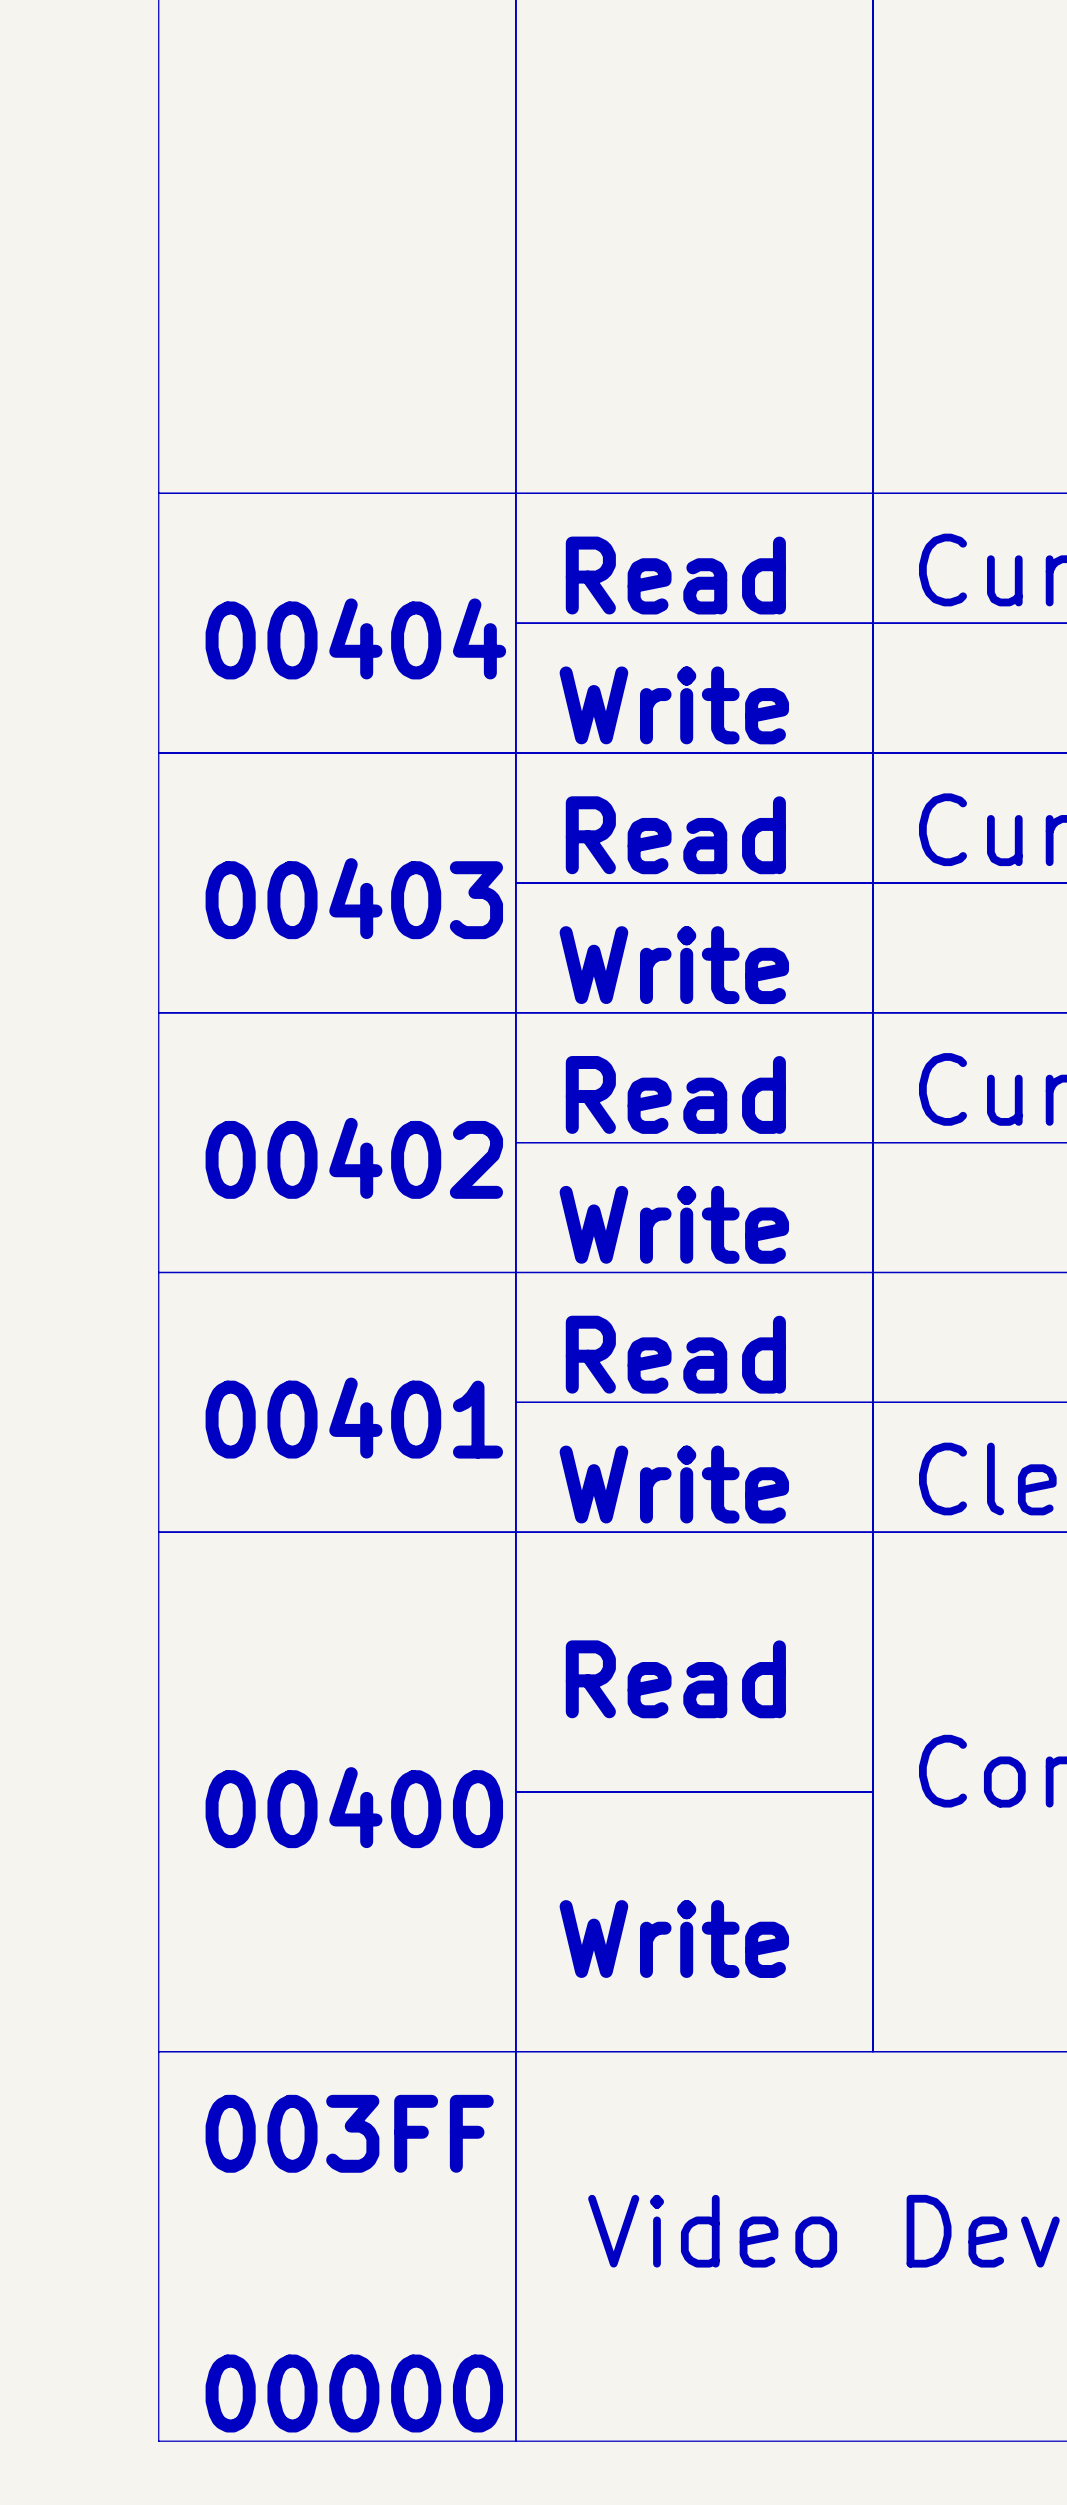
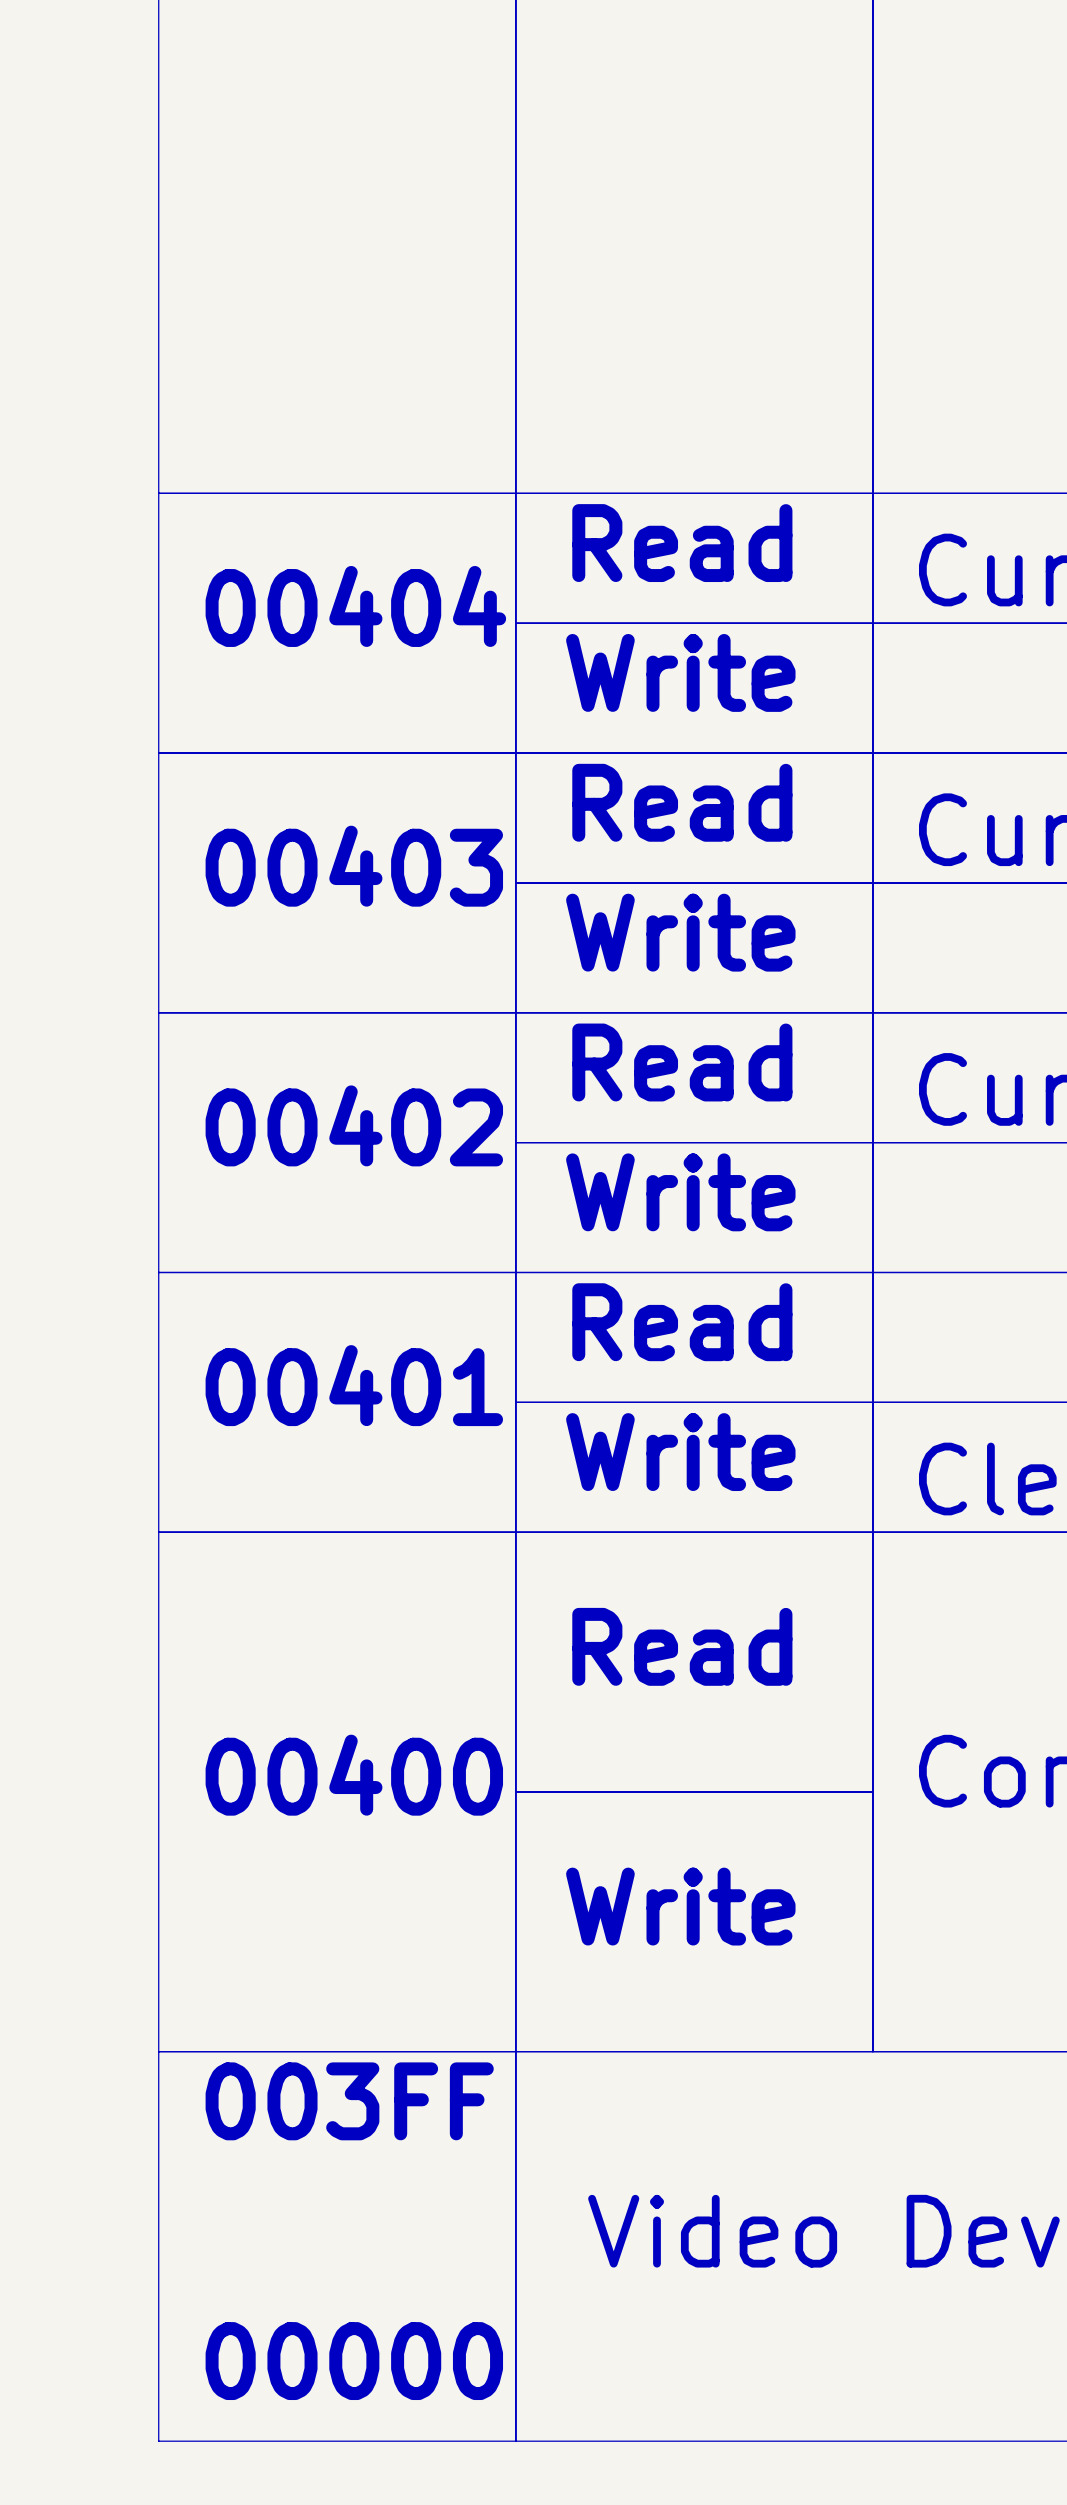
text position: Read (675, 575) -> Read (682, 543)
text position: 00404 (355, 638) -> 00404 (355, 606)
text position: Write (674, 705) -> Write (680, 672)
text position: Read (675, 835) -> Read (682, 802)
text position: 00403 (354, 898) -> 00403 (354, 866)
text position: Write (674, 965) -> Write (680, 932)
text position: Read (675, 1094) -> Read (682, 1062)
text position: 00402 (354, 1158) -> 00402 (354, 1125)
text position: Write (674, 1224) -> Write (680, 1192)
text position: Read (675, 1354) -> Read (682, 1322)
text position: 00401 (354, 1418) -> 00401 (354, 1385)
text position: Write (674, 1484) -> Write (680, 1452)
text position: Read (675, 1679) -> Read (682, 1646)
text position: 00400 (354, 1807) -> 00400 (354, 1775)
text position: Write (674, 1939) -> Write (680, 1906)
text position: 003FF (349, 2133) -> 003FF (349, 2101)
text position: 00000 (354, 2393) -> 00000 (354, 2361)

